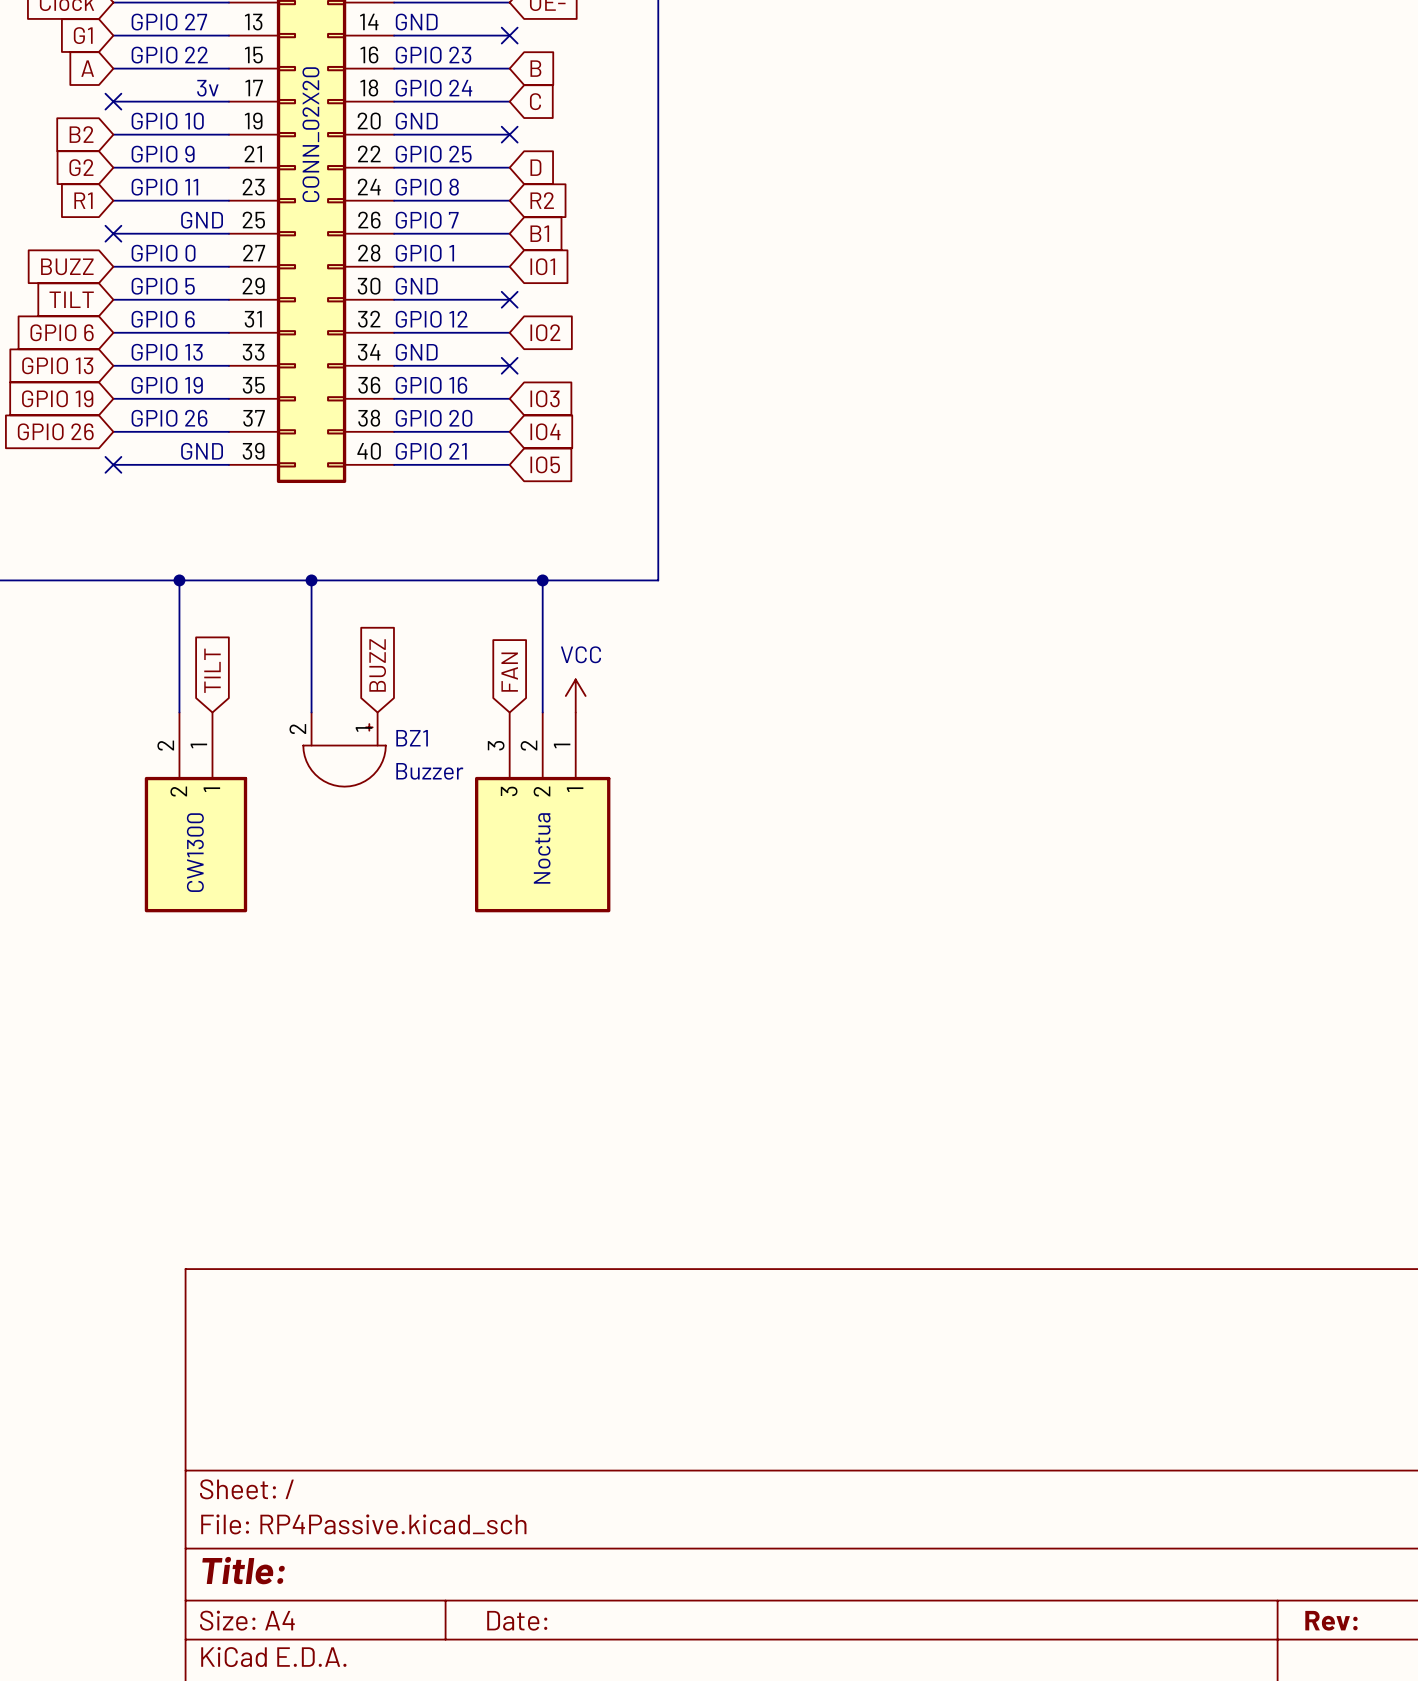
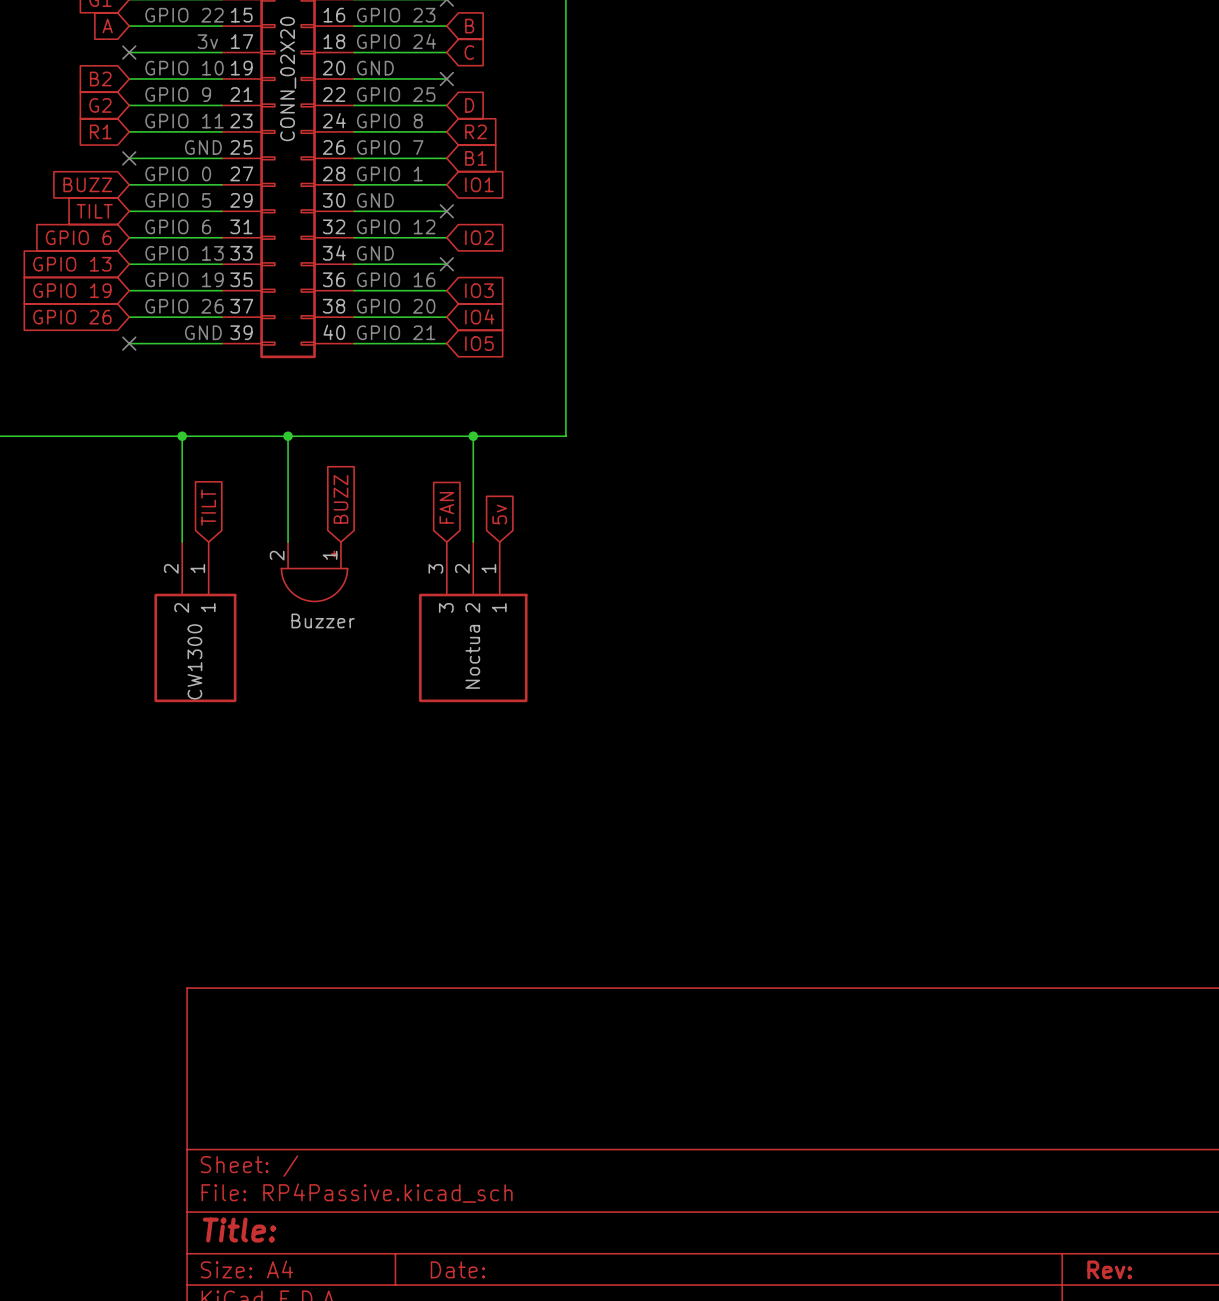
global label: none -> 5v (499, 514)
power symbol: VCC (575, 696) -> none
BZ1 name: BZ1 (412, 738) -> none
BZ1 value position: Buzzer (429, 771) -> Buzzer (323, 620)

